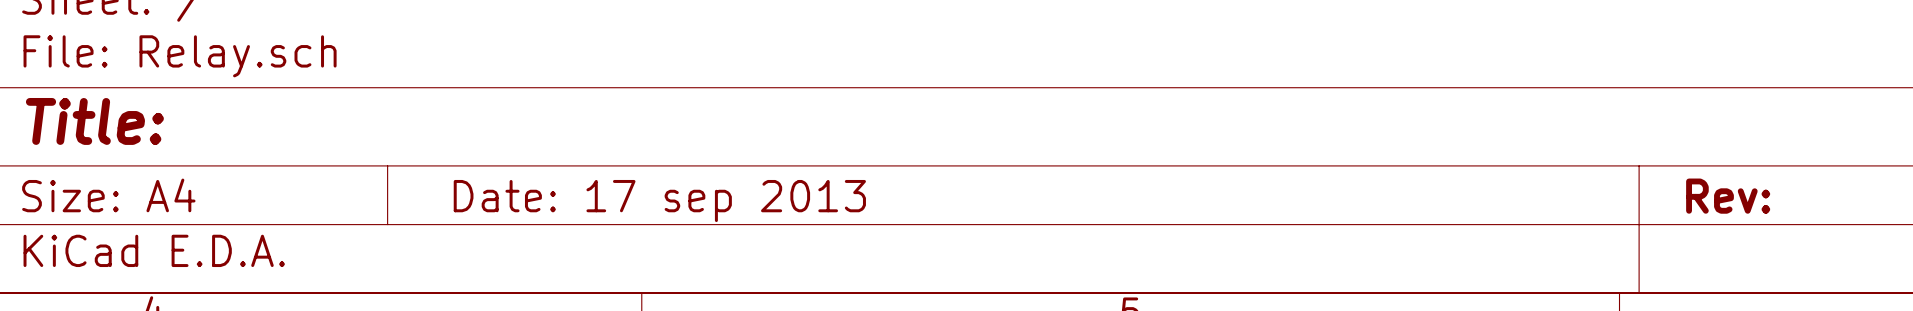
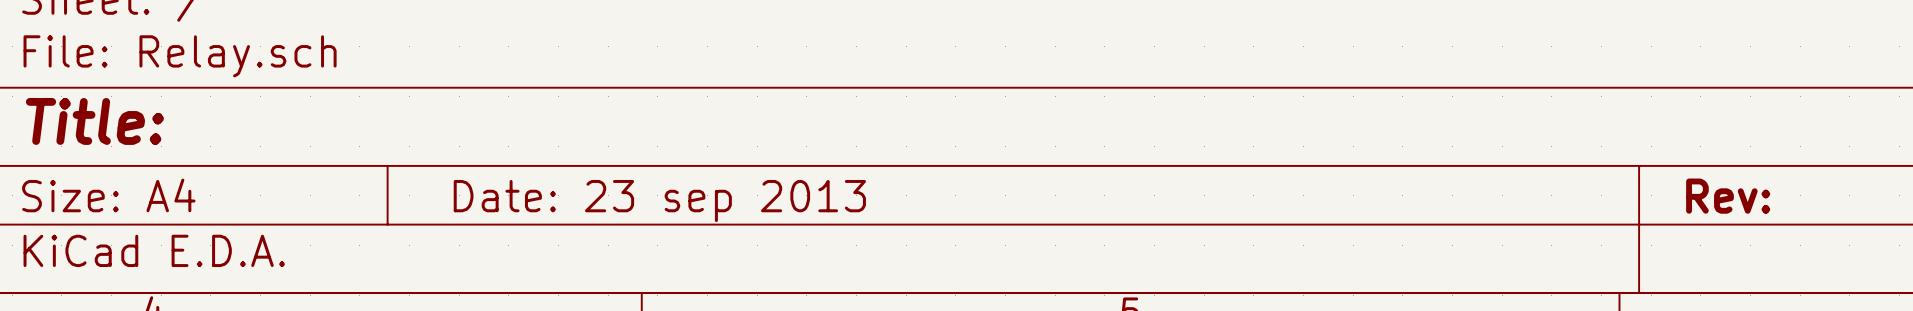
title block: Date: 17 sep 2013 (659, 201) -> Date: 23 sep 2013 (659, 201)

